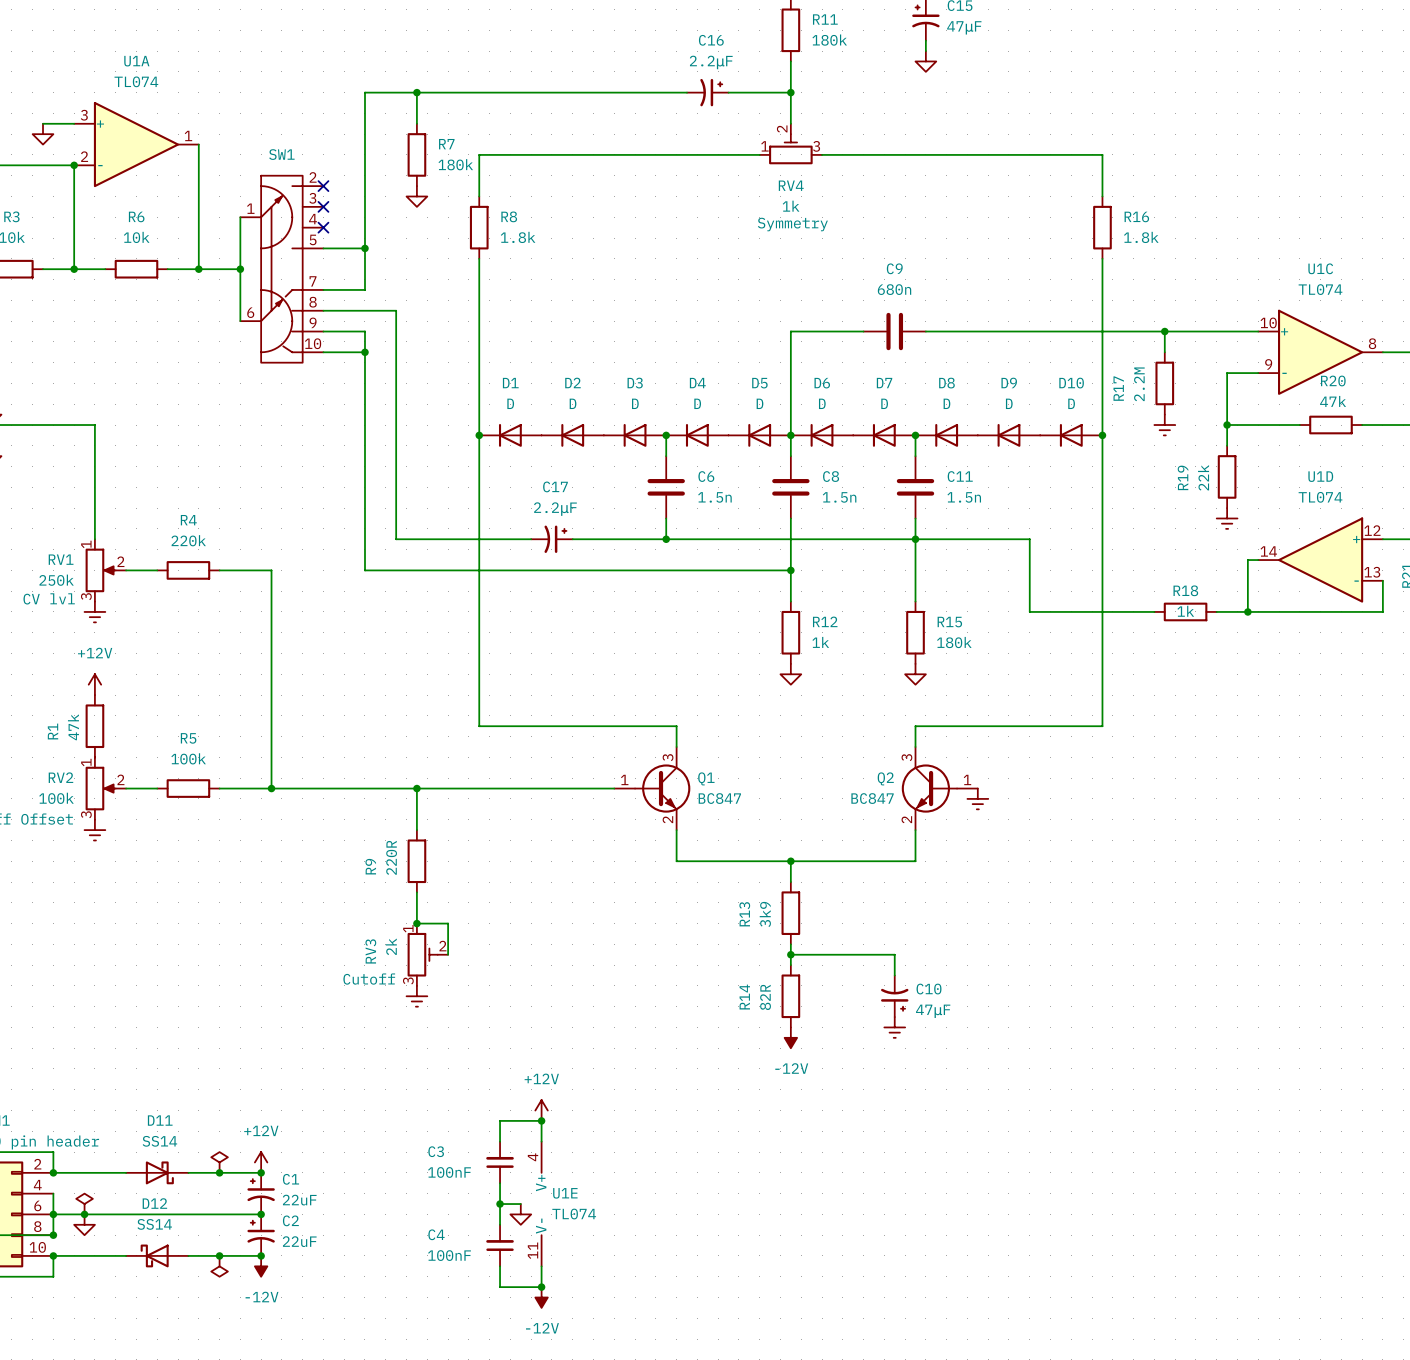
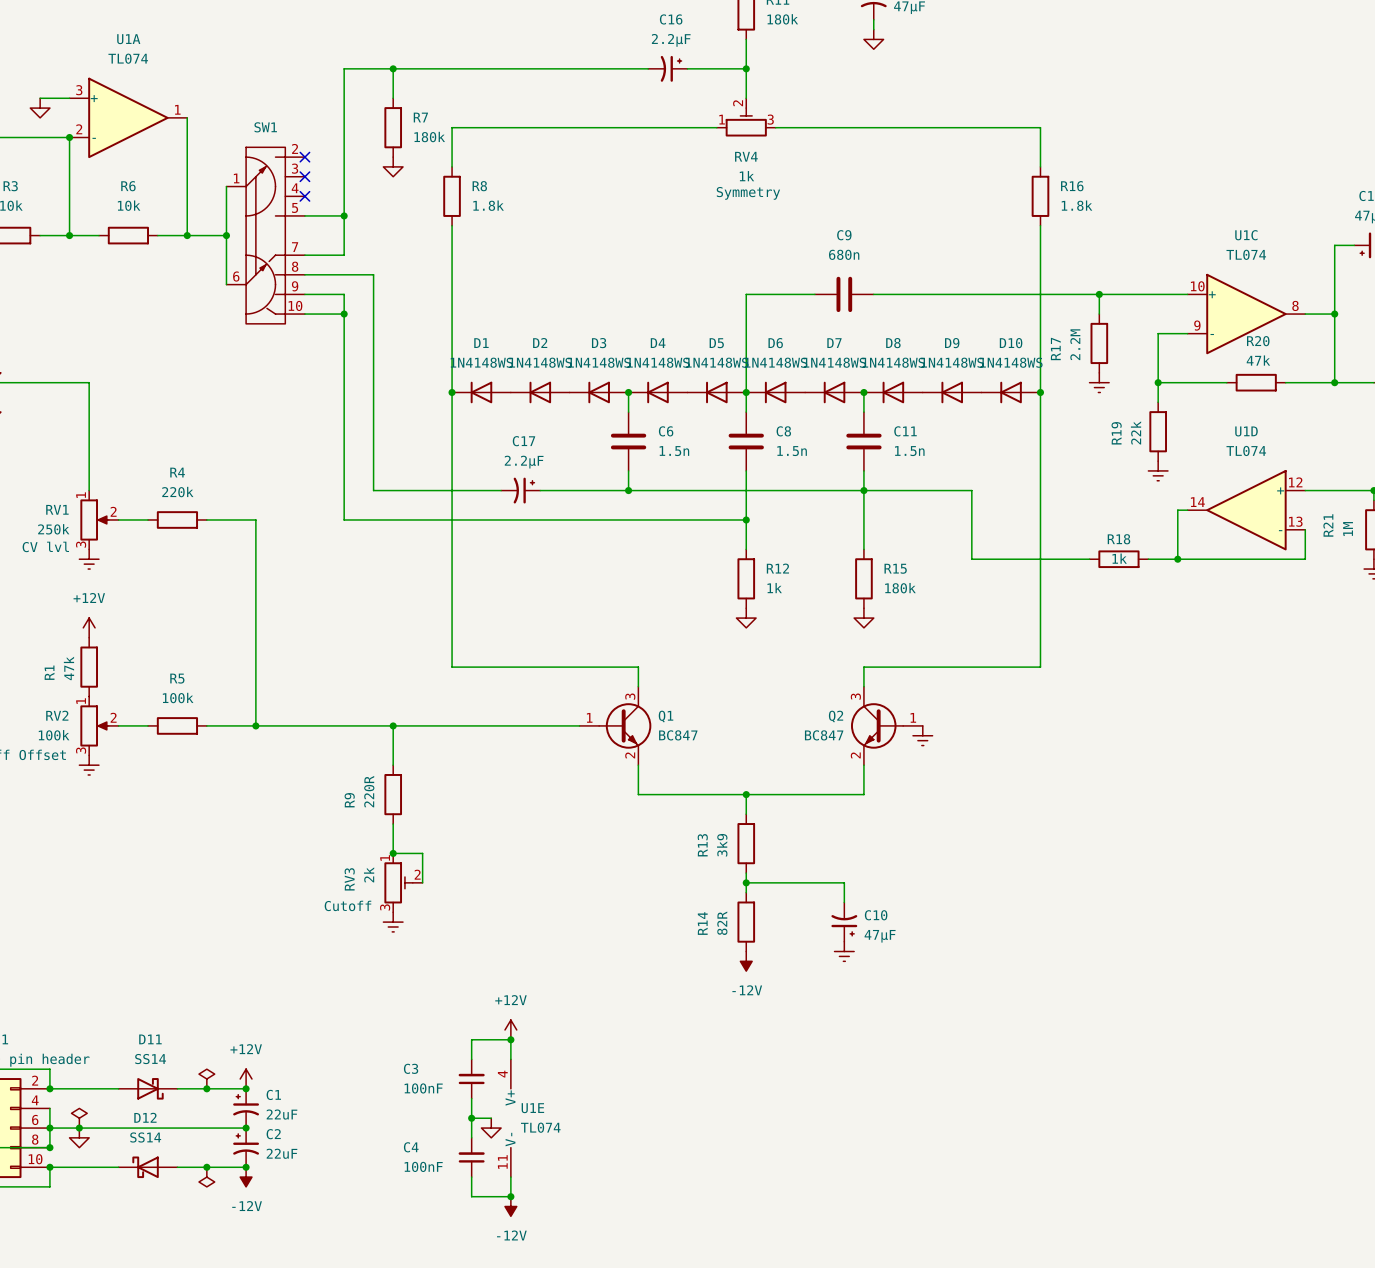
D1 value: D (510, 403) -> 1N4148WS (481, 362)
D2 value: D (573, 403) -> 1N4148WS (540, 362)
D3 value: D (635, 403) -> 1N4148WS (599, 362)
D4 value: D (697, 403) -> 1N4148WS (658, 362)
D5 value: D (759, 403) -> 1N4148WS (717, 362)
D6 value: D (822, 403) -> 1N4148WS (776, 362)
D7 value: D (884, 403) -> 1N4148WS (834, 362)
D8 value: D (946, 403) -> 1N4148WS (893, 362)
D9 value: D (1009, 403) -> 1N4148WS (952, 362)
D10 value: D (1071, 403) -> 1N4148WS (1011, 362)

